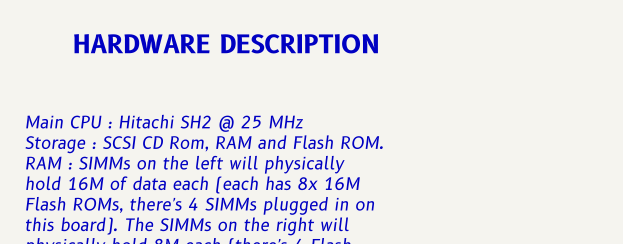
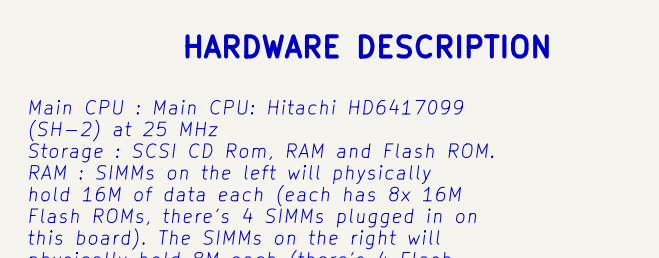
text position: HARDWARE DESCRIPTION (226, 43) -> HARDWARE DESCRIPTION (367, 46)
text: none -> Main CPU : Main CPU: Hitachi HD6417099 (246, 106)
text: Main CPU : Hitachi SH2 @ 25 MHz (164, 123) -> (SH-2) at 25 MHz (123, 130)

